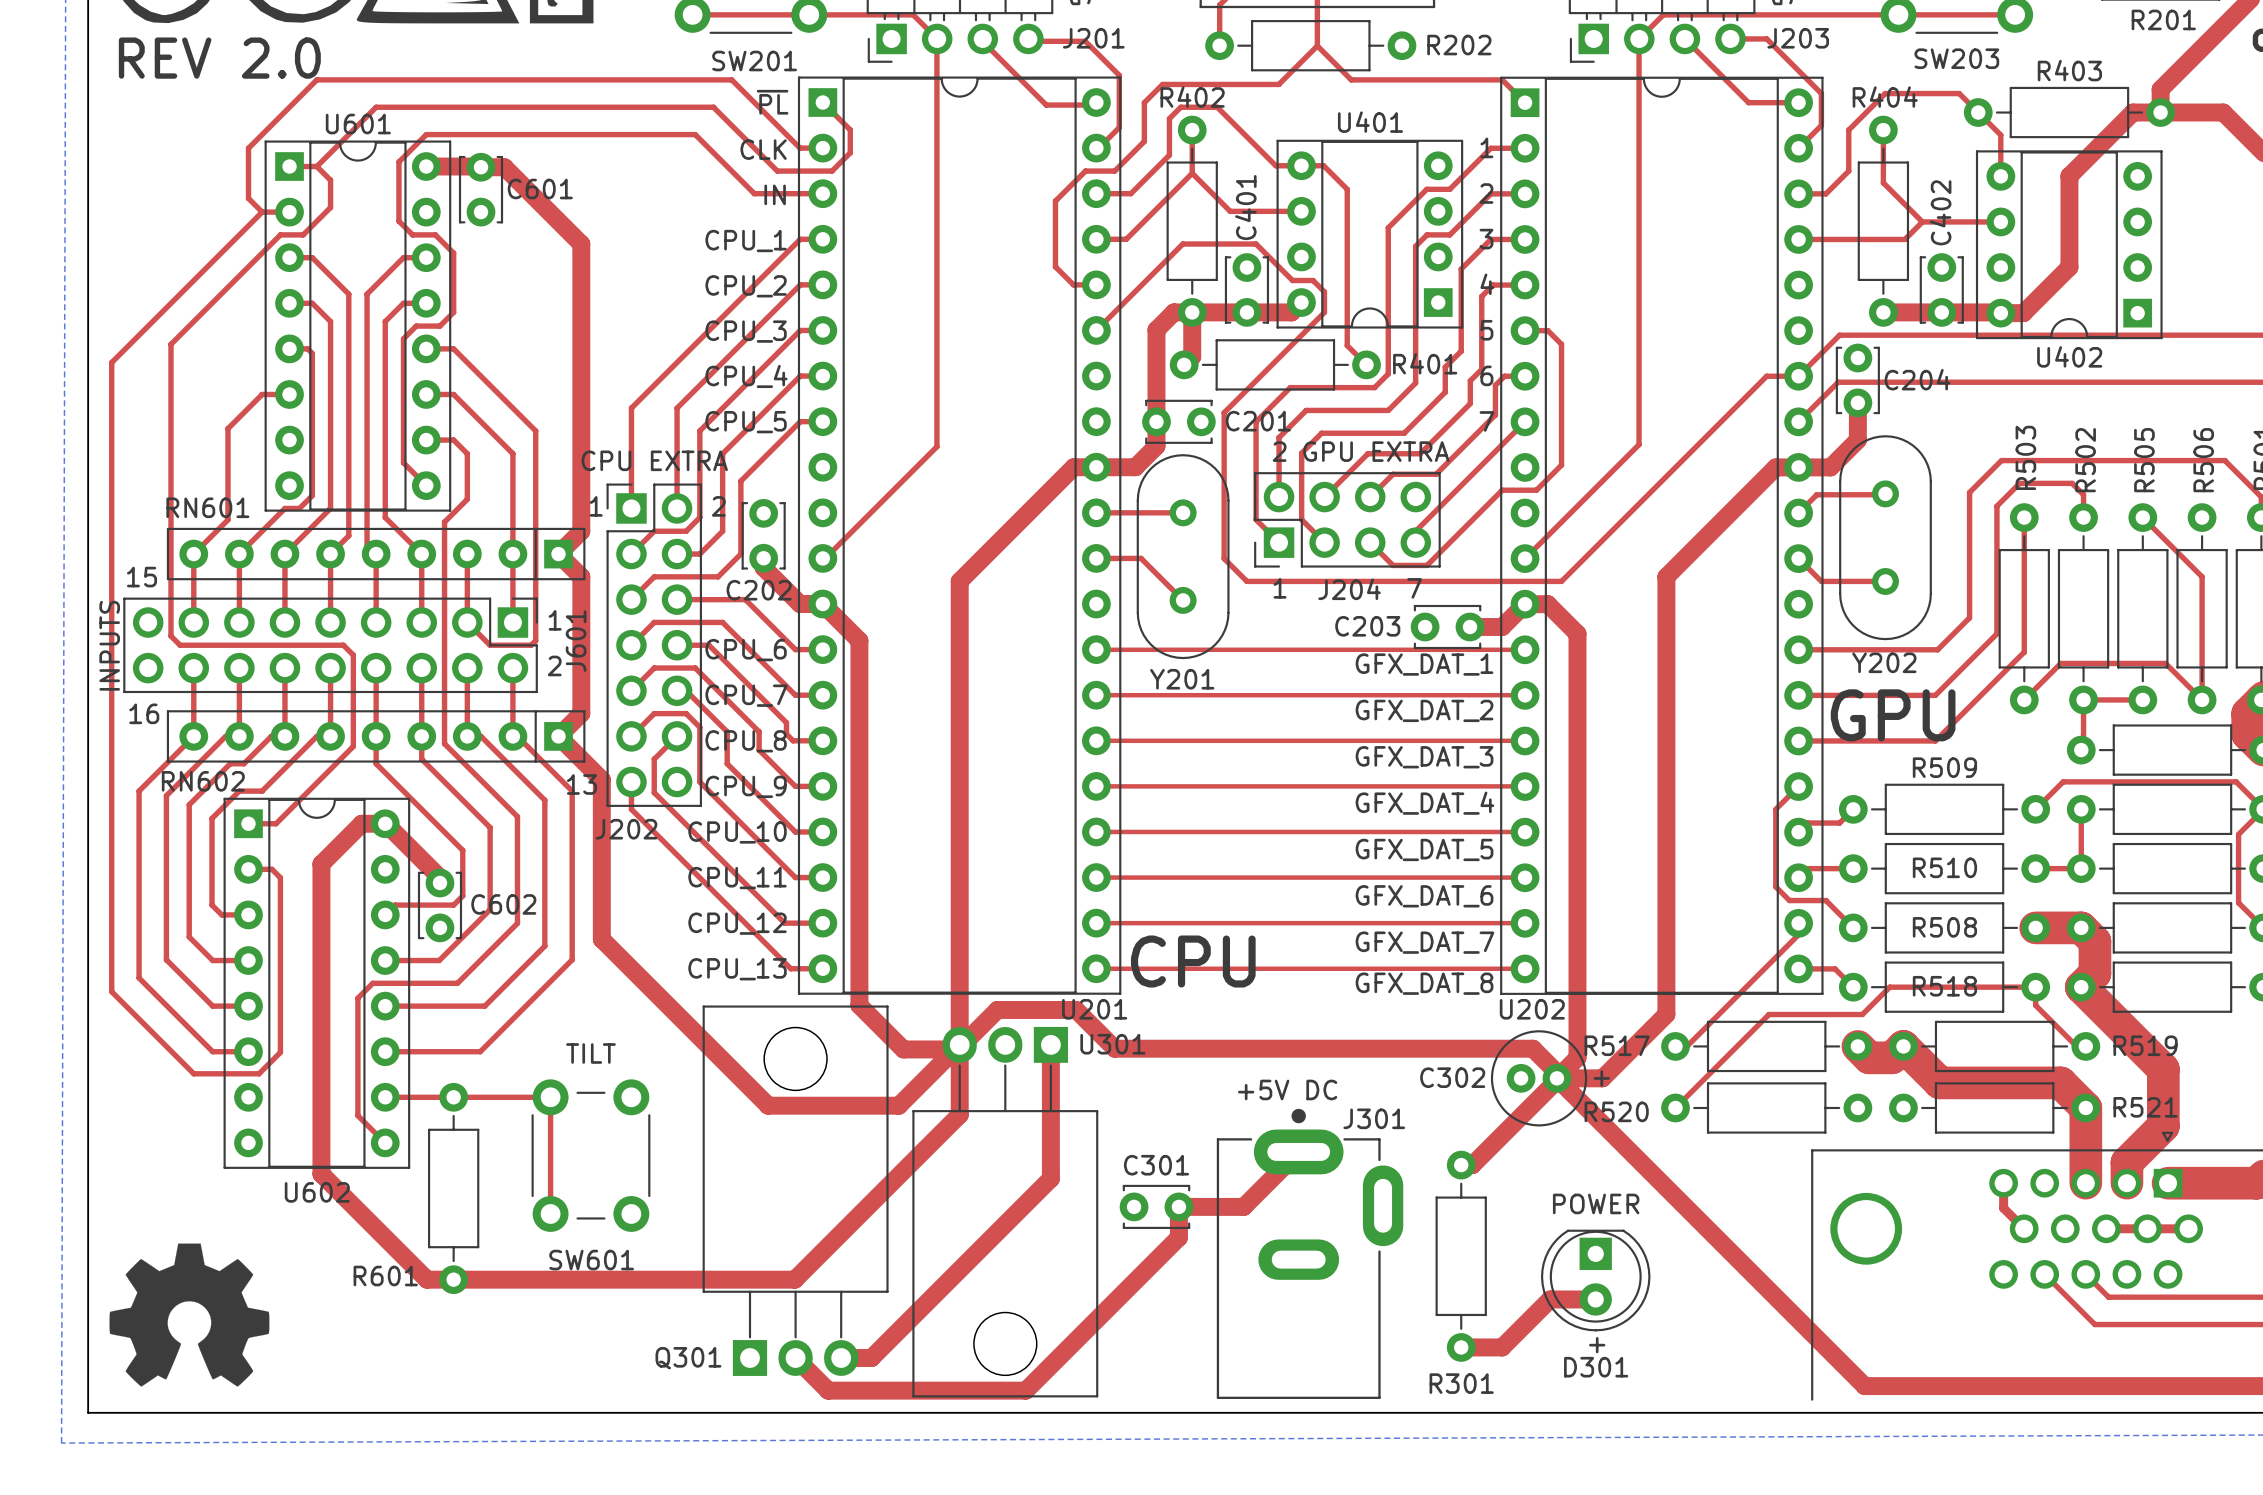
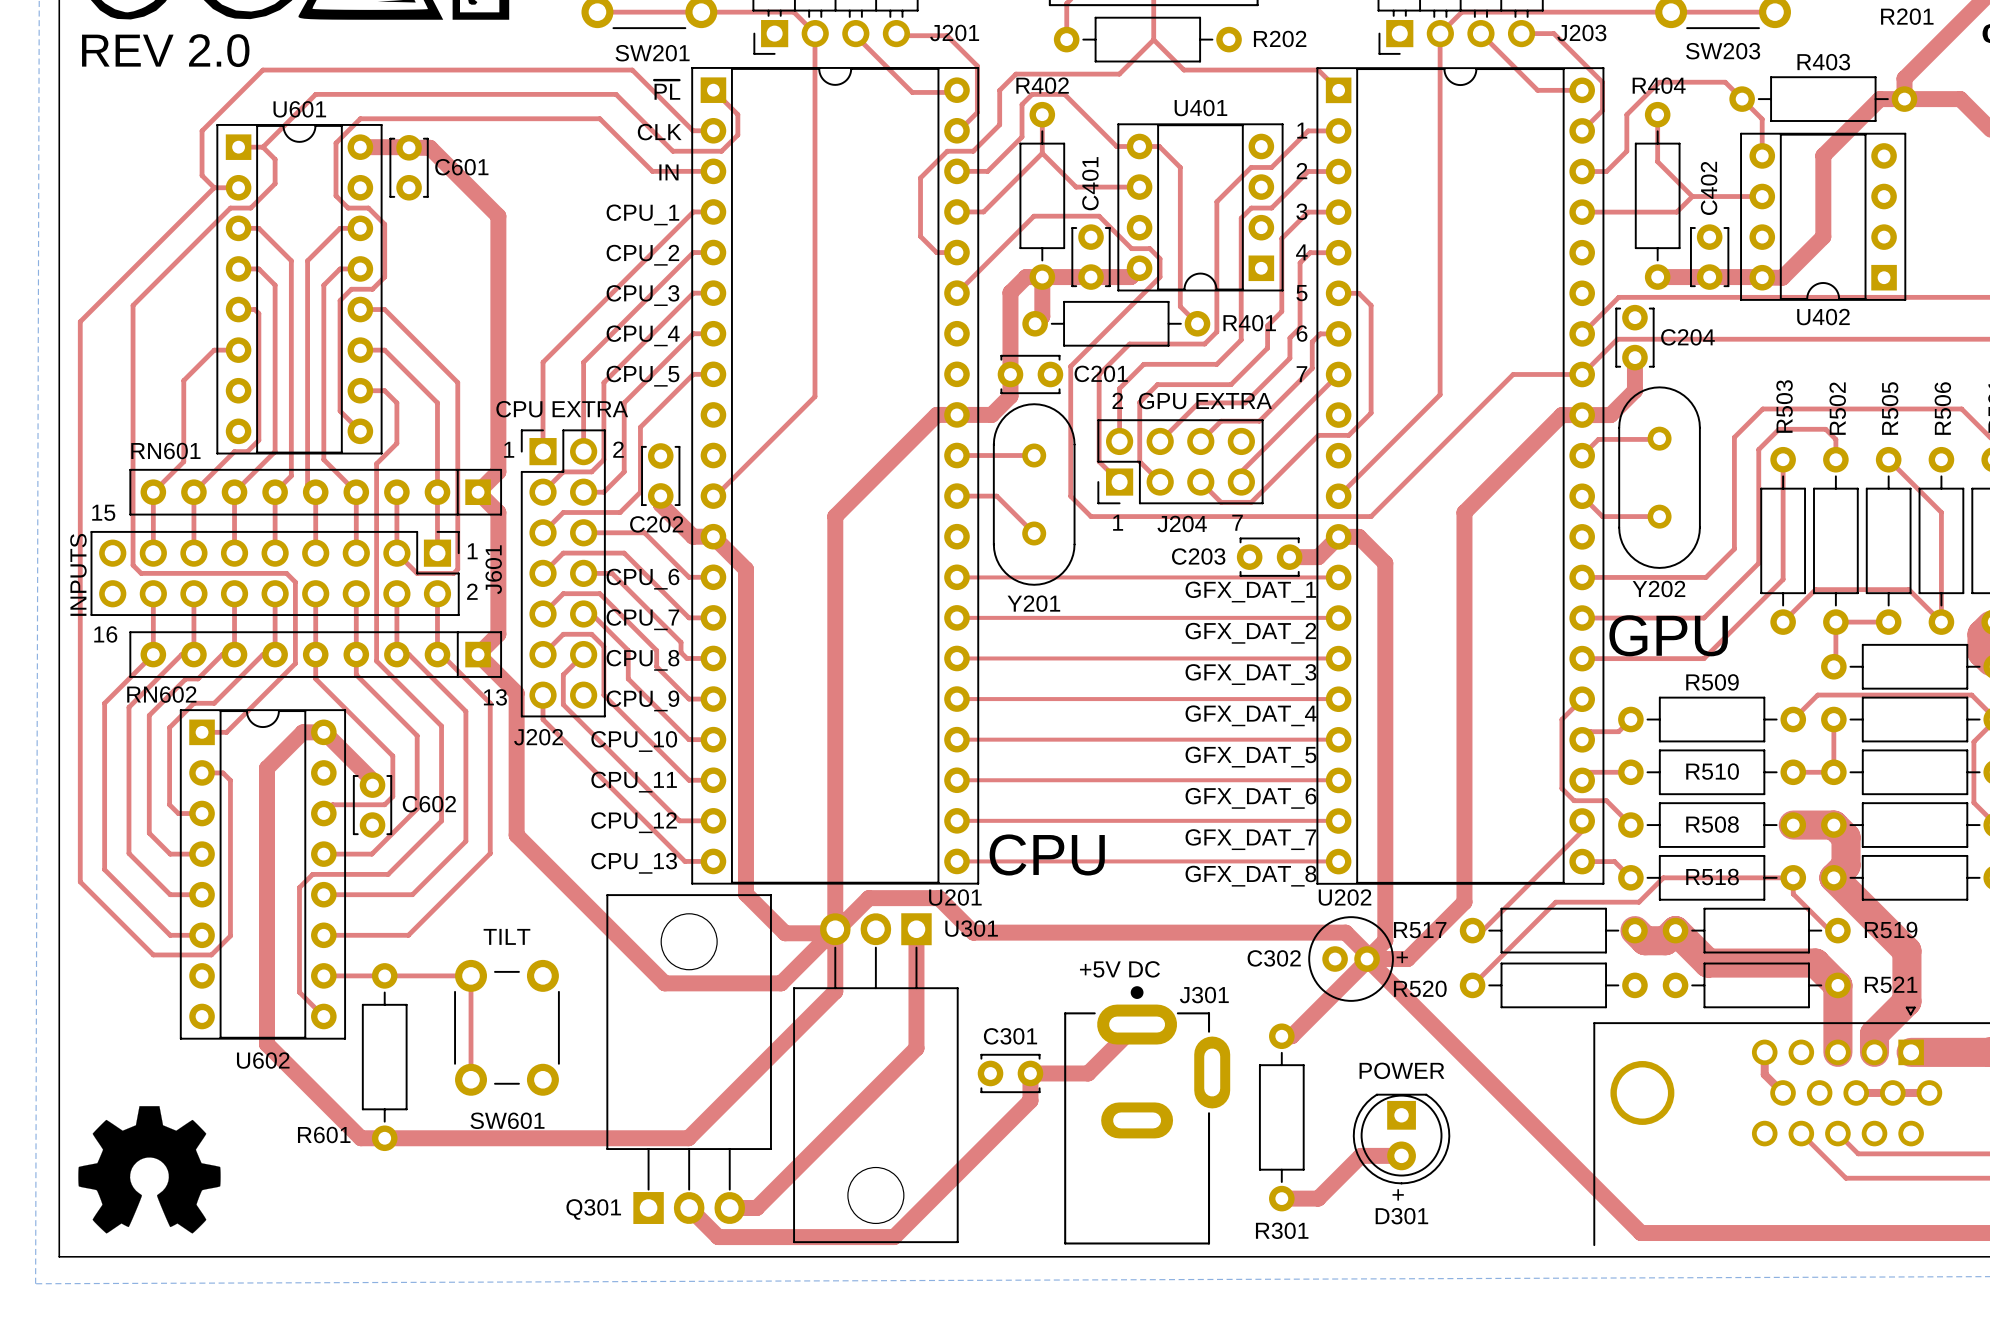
top track: (1798, 376) (1766, 376) (1721, 421) -> (1582, 374) (1513, 374)

